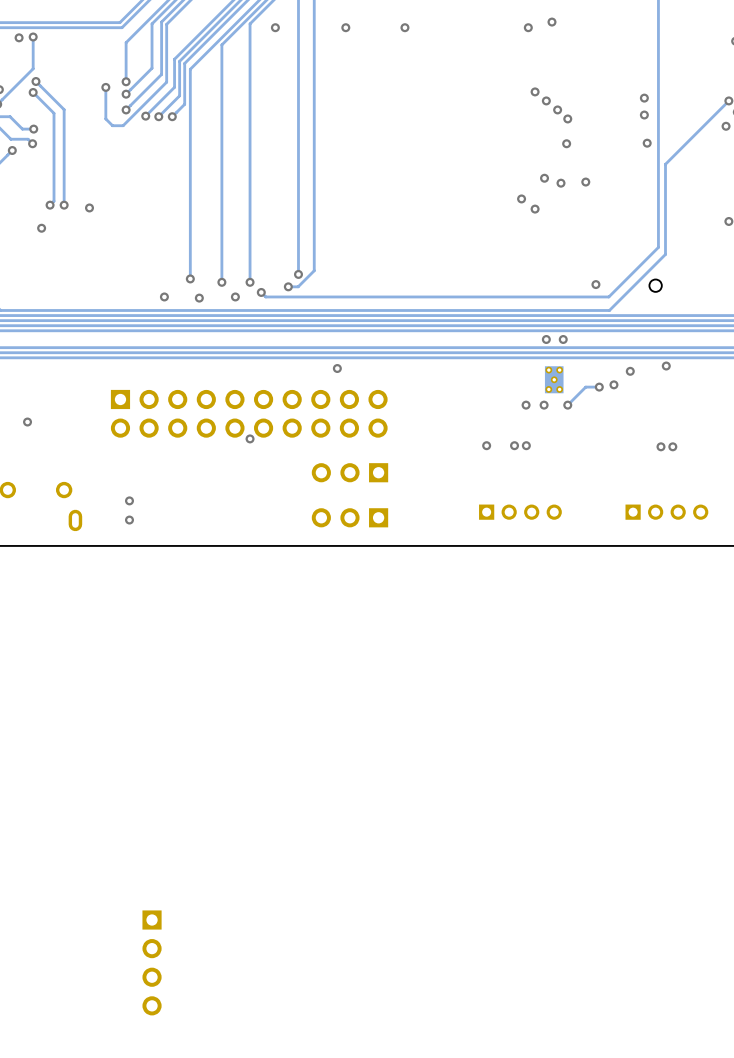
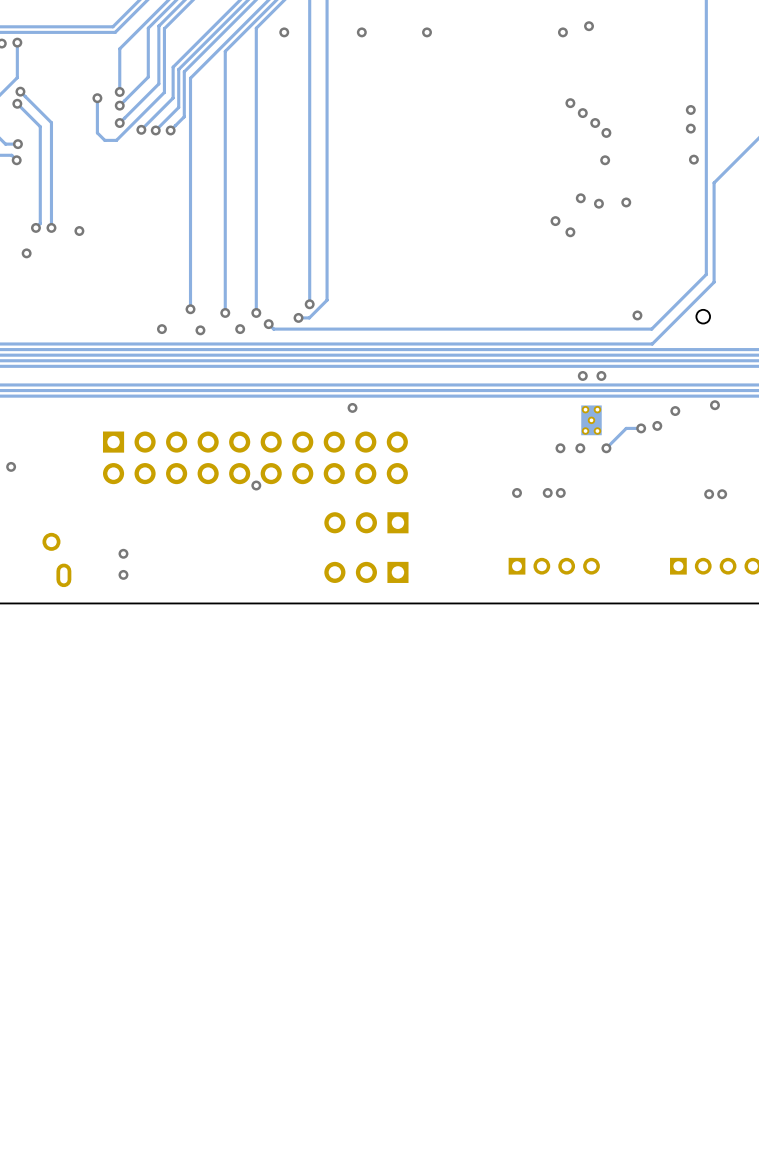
part: (152, 962) -> none

